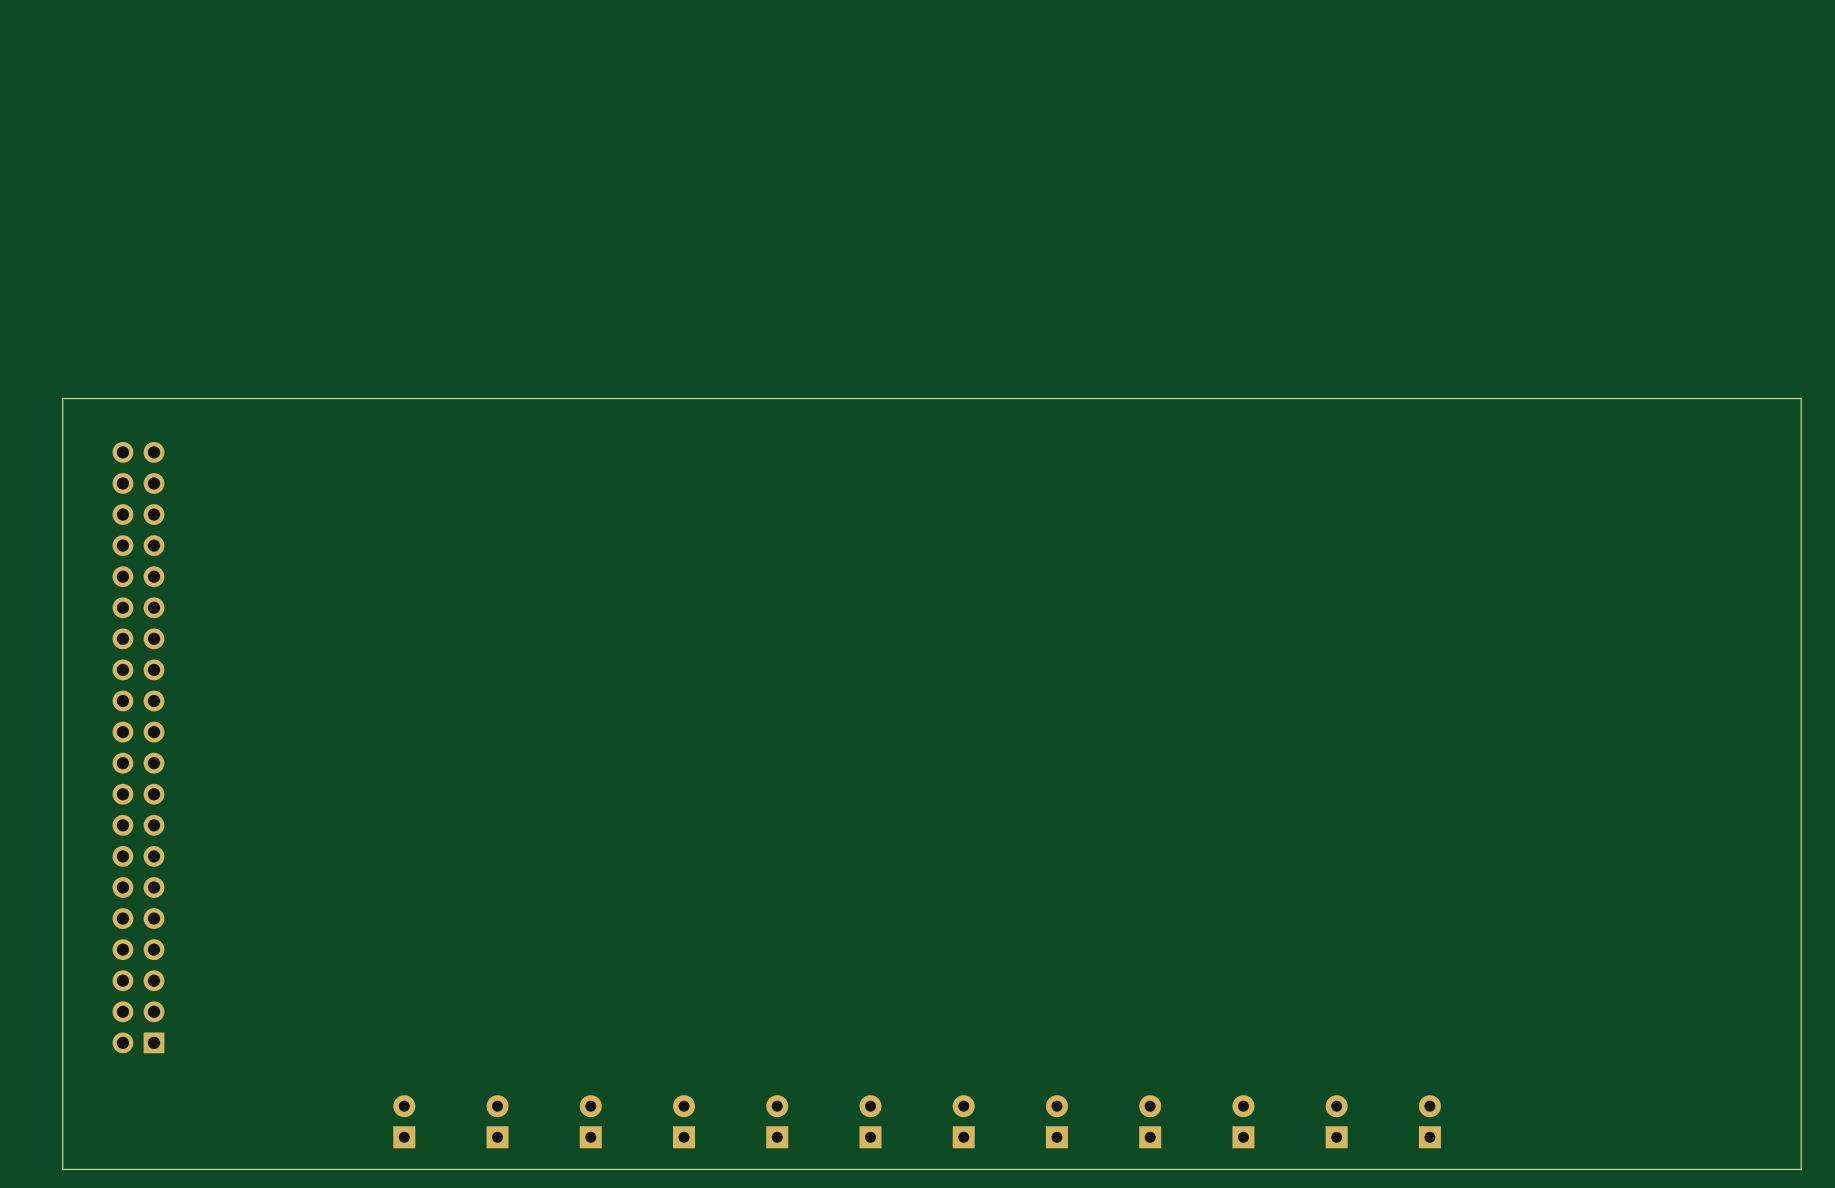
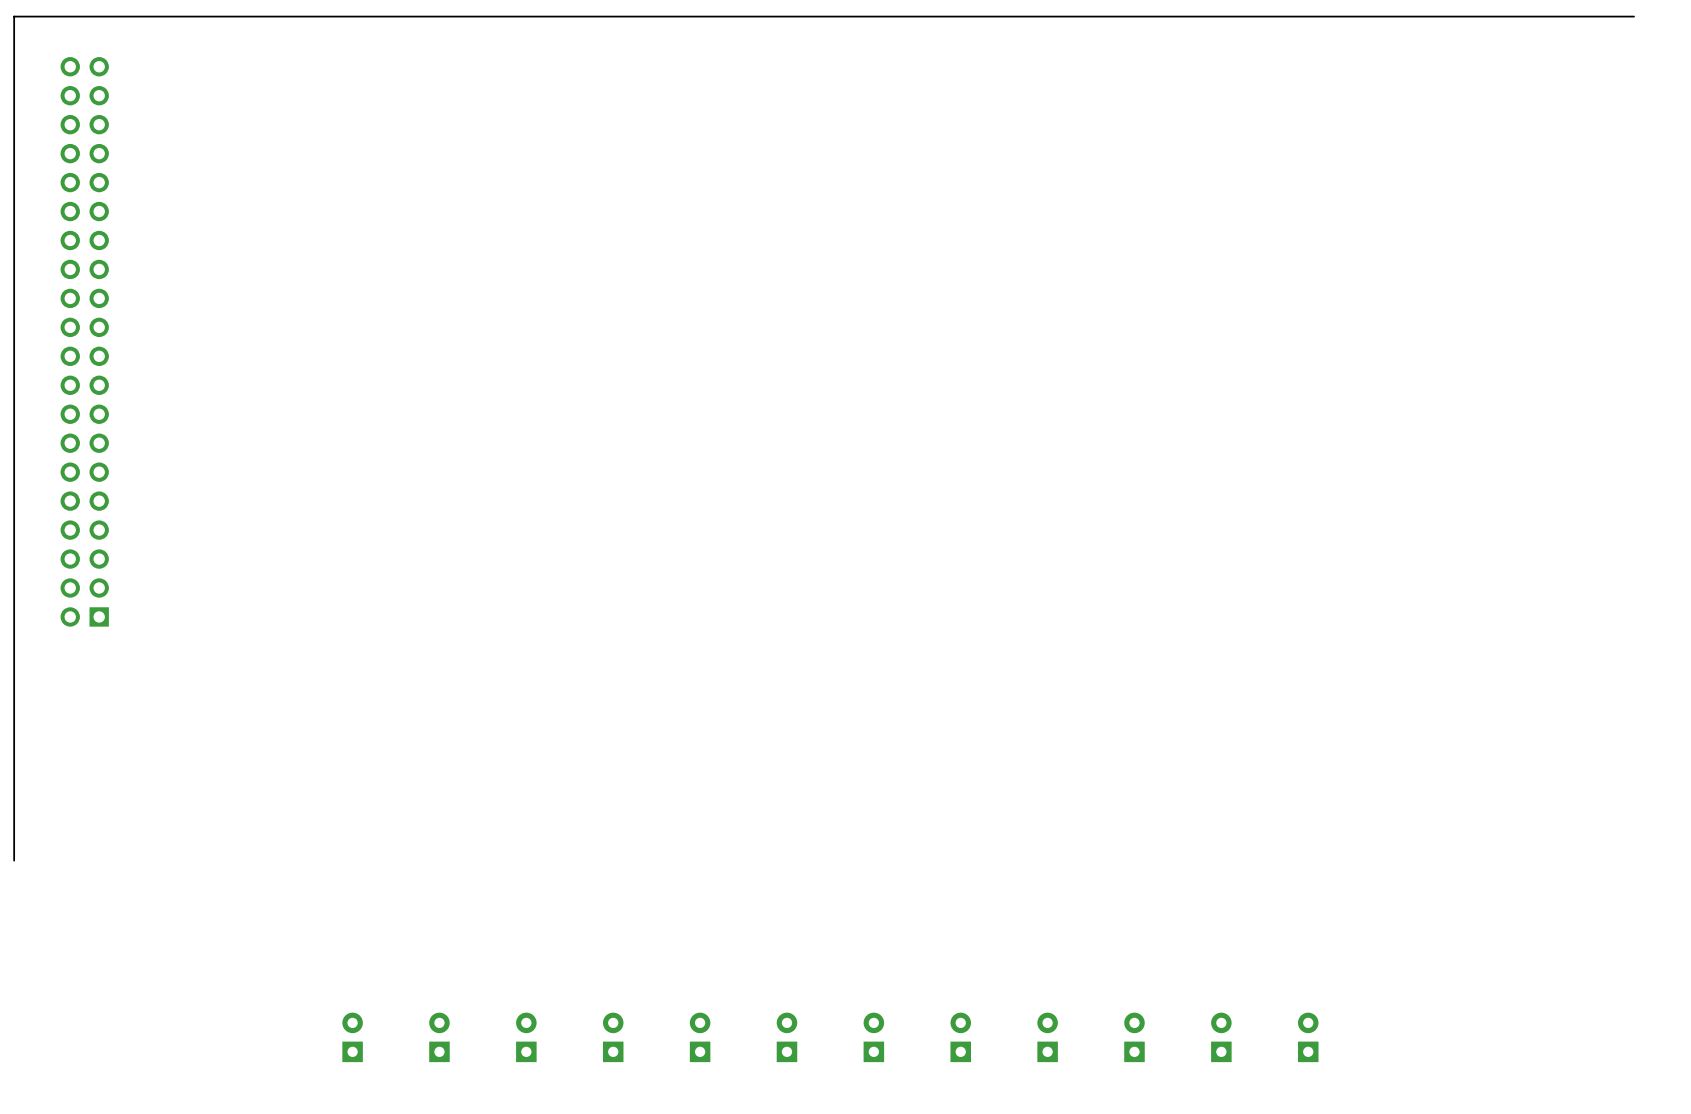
board edge: none -> (1634, 16) (14, 16) (14, 860)
part: none -> (84, 341)
board edge: (1801, 398) (1801, 1169) (62, 1169) (62, 398) (1801, 398) -> none
part: (138, 747) -> none

